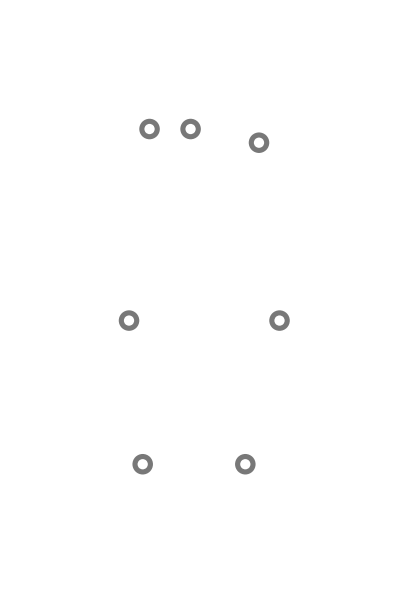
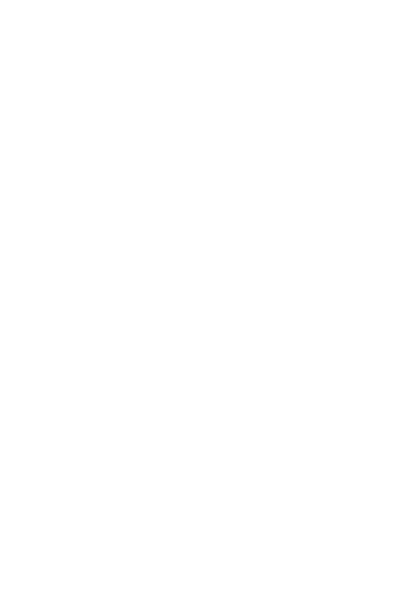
via: (149, 129) -> none
via: (190, 129) -> none
via: (259, 142) -> none
via: (129, 320) -> none
via: (279, 320) -> none
via: (142, 464) -> none
via: (245, 464) -> none

